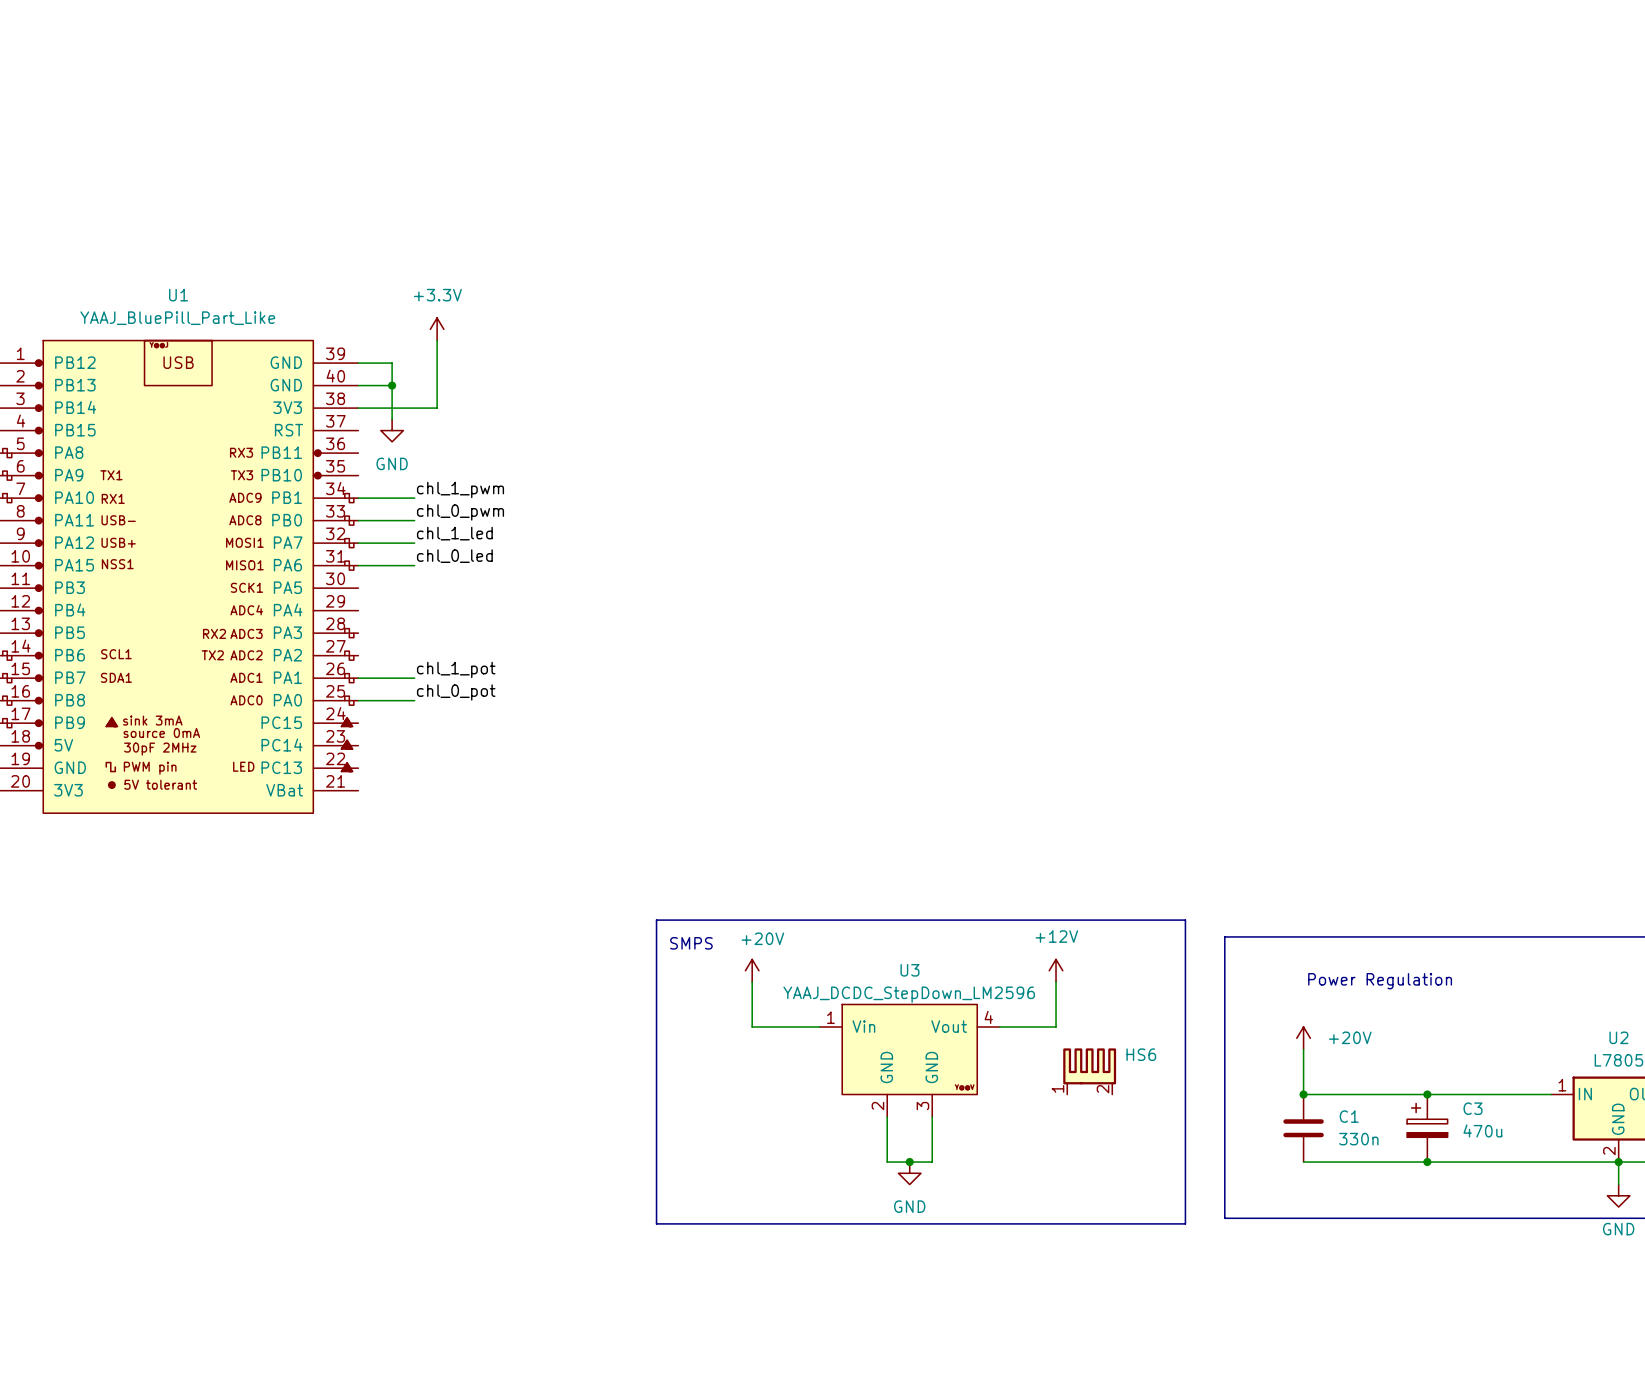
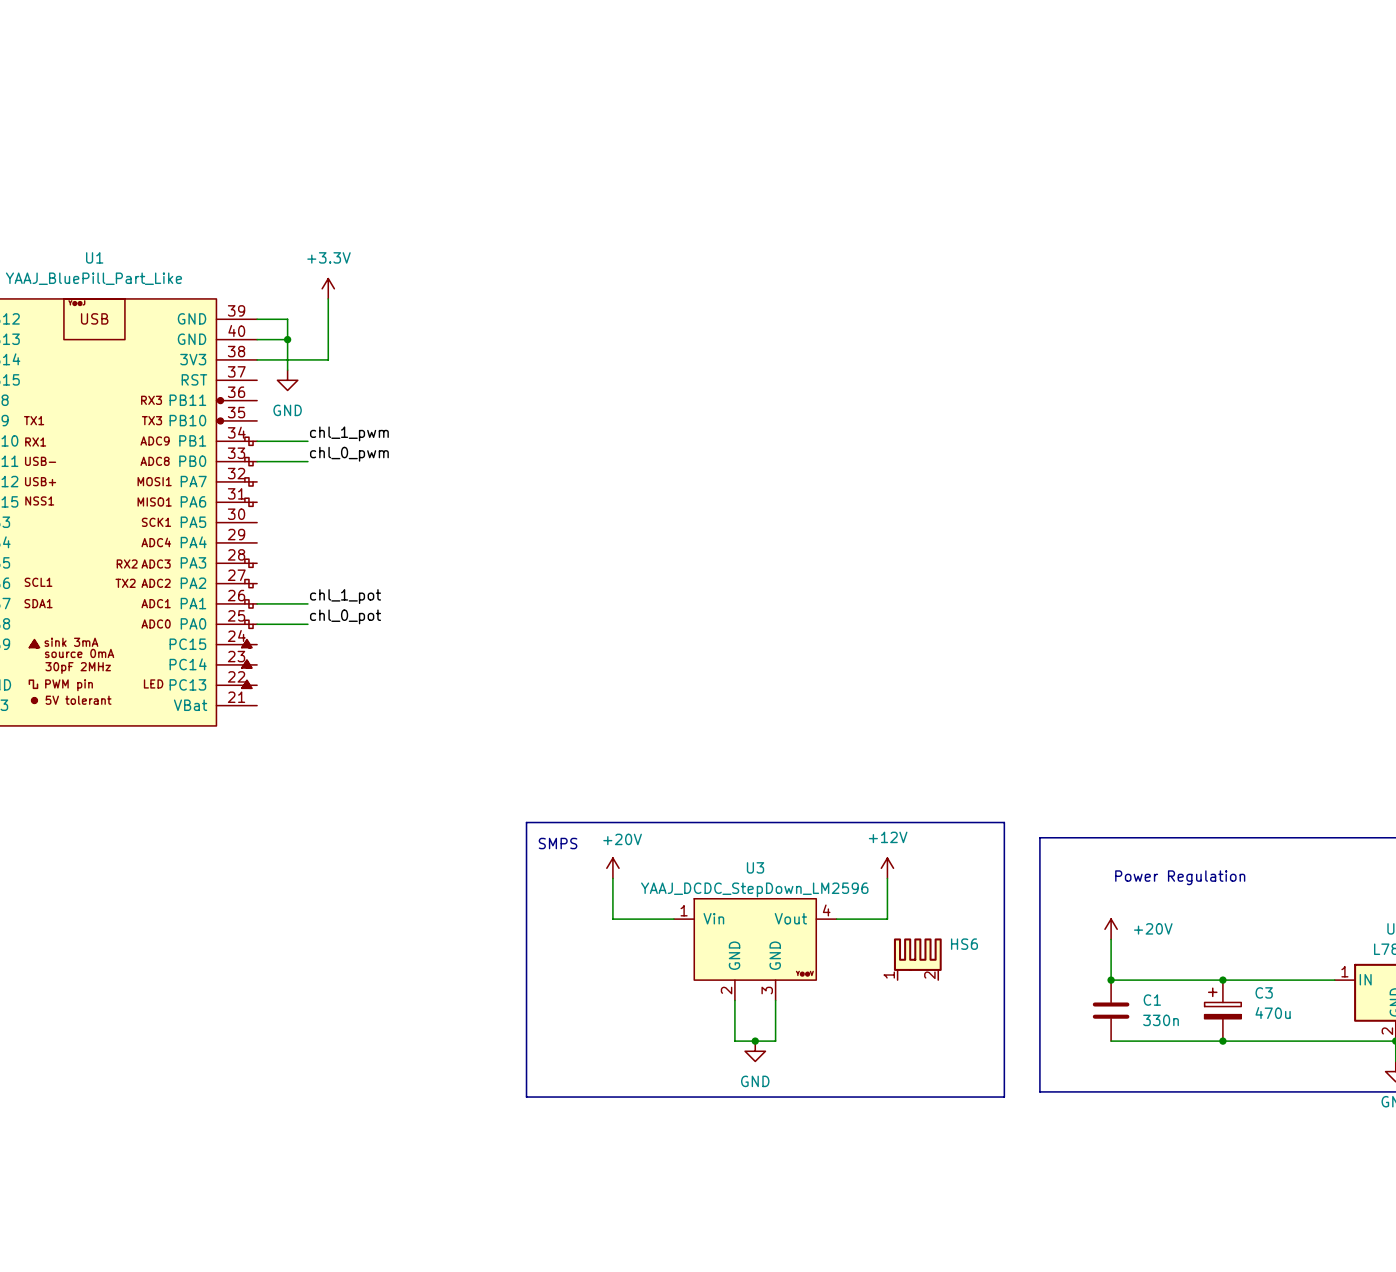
label: chl_1_led (454, 533) -> none
wire: (358, 543) (414, 543) -> none
label: chl_0_led (454, 556) -> none
wire: (358, 565) (414, 565) -> none

